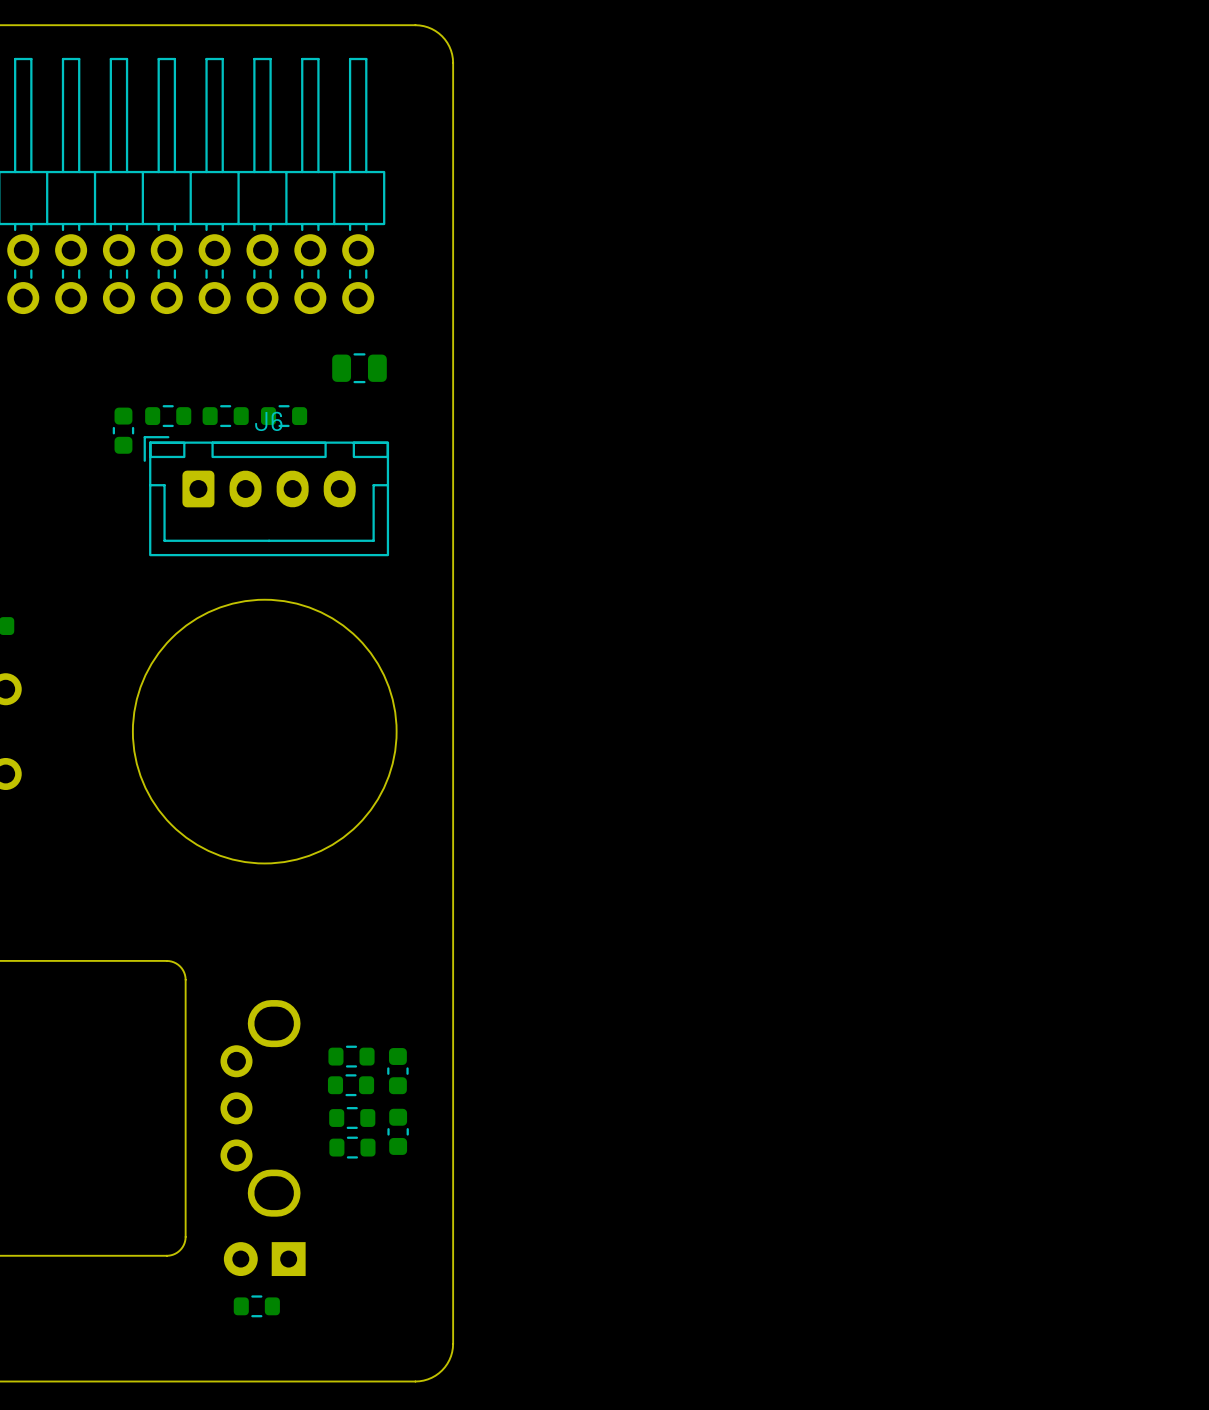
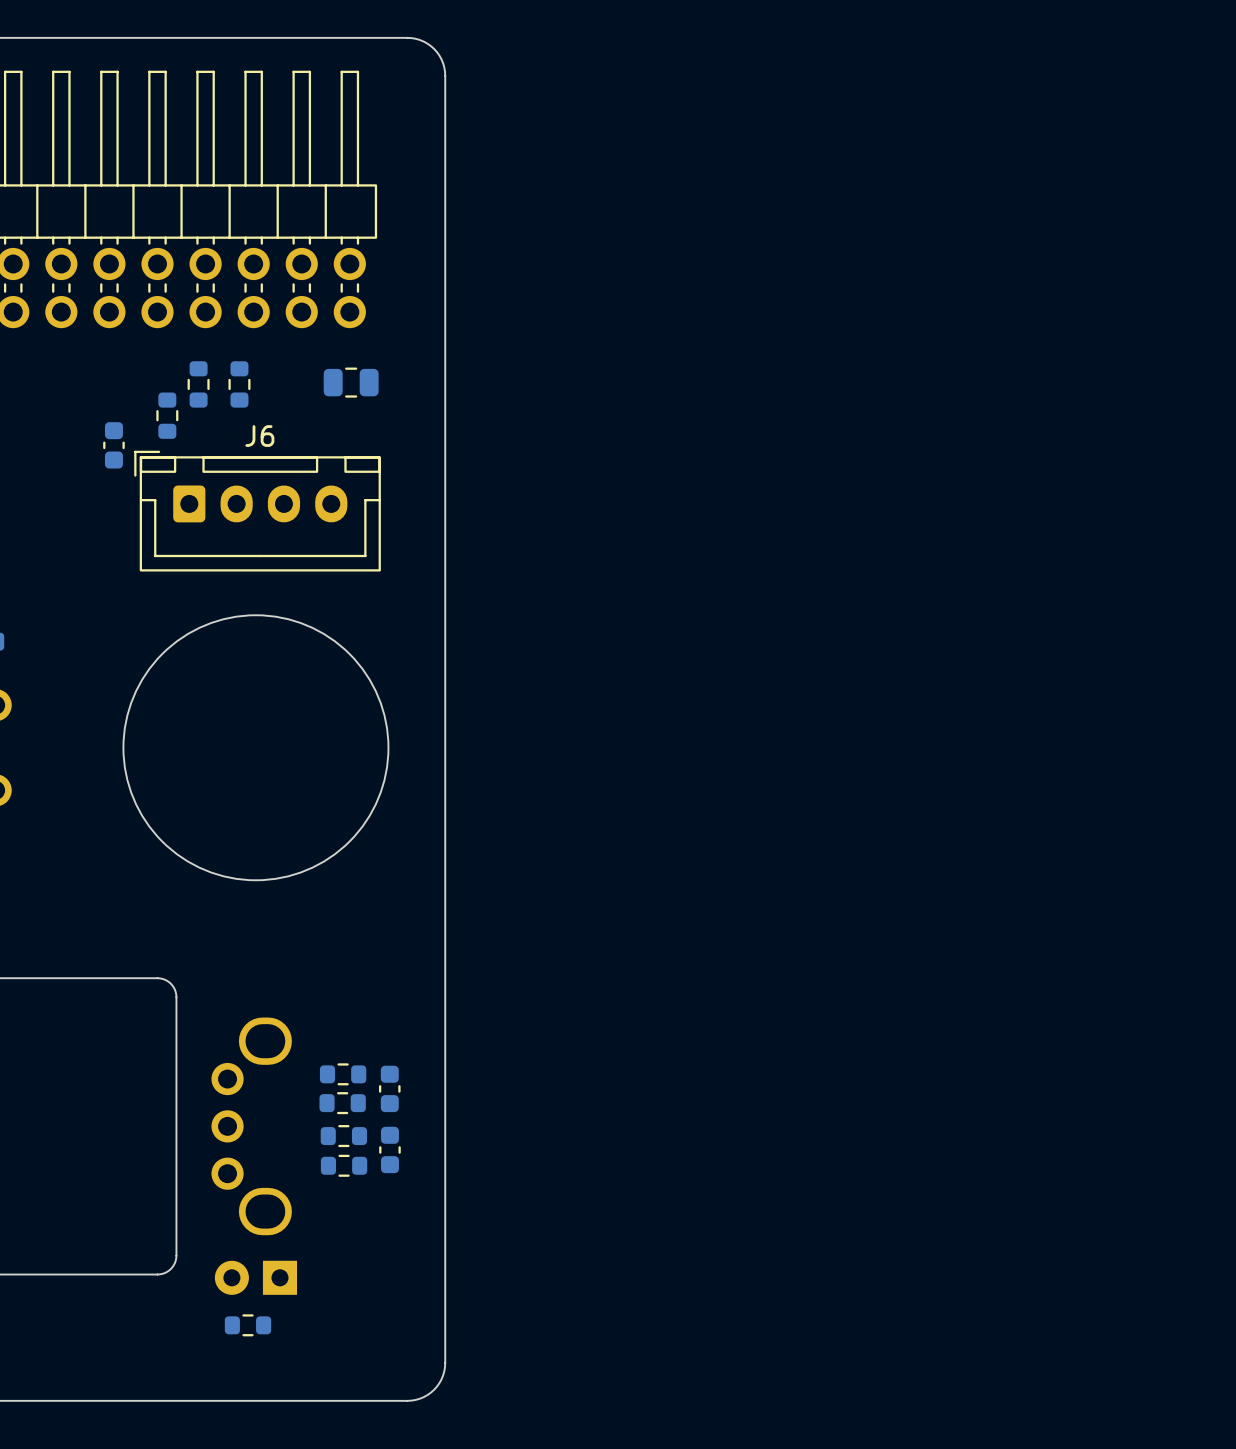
part: none -> (198, 384)
part: none -> (239, 384)
part rotation: 0° (168, 416) -> 90° clockwise (167, 415)
part: (225, 416) -> none
part: (284, 416) -> none

